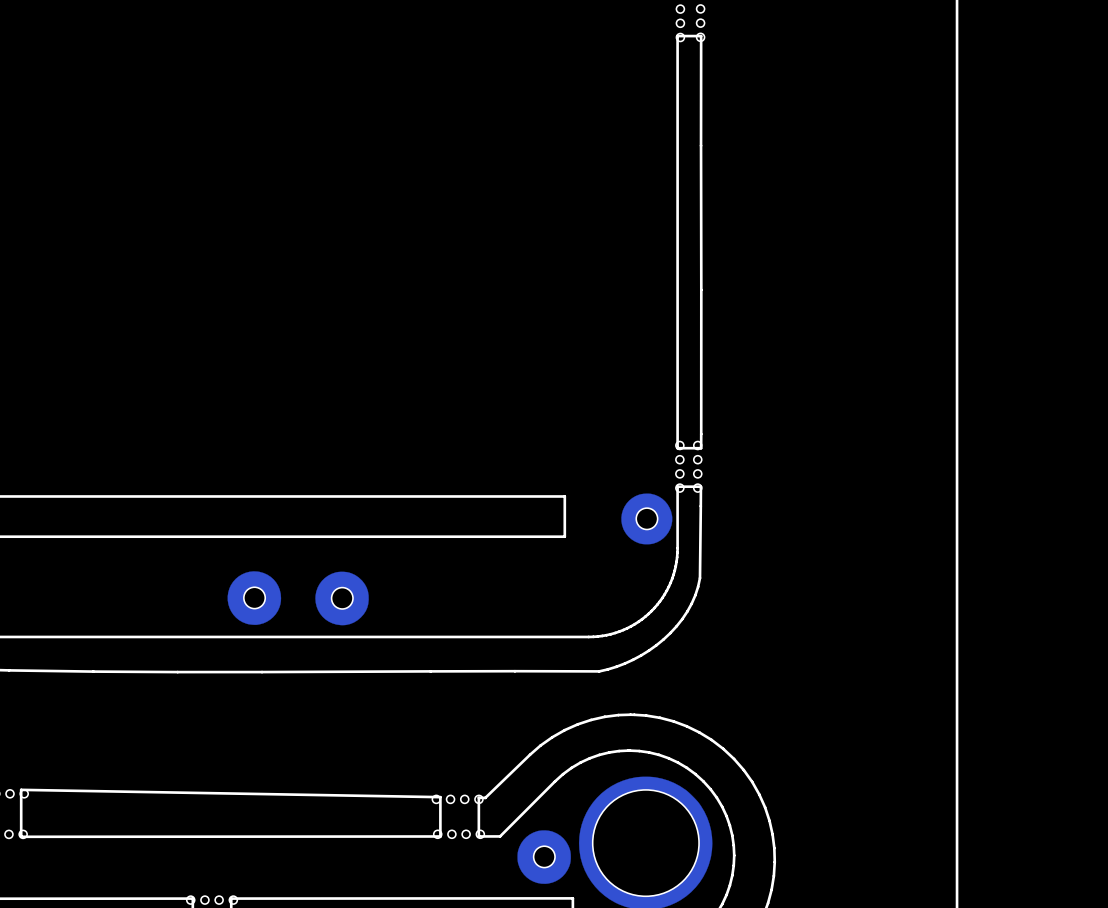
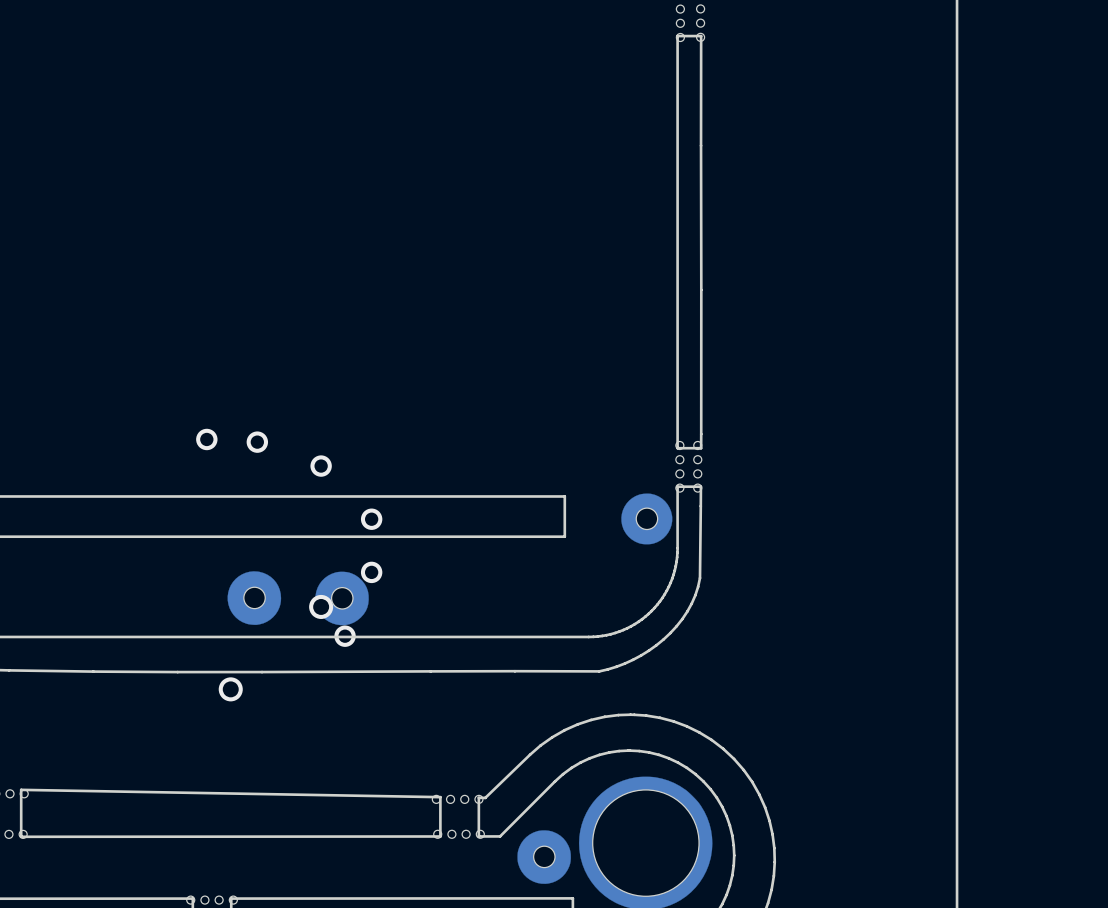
via: none -> (206, 439)
via: none -> (257, 442)
via: none -> (321, 466)
via: none -> (371, 519)
via: none -> (371, 572)
via: none -> (321, 606)
via: none -> (345, 636)
via: none -> (230, 689)

